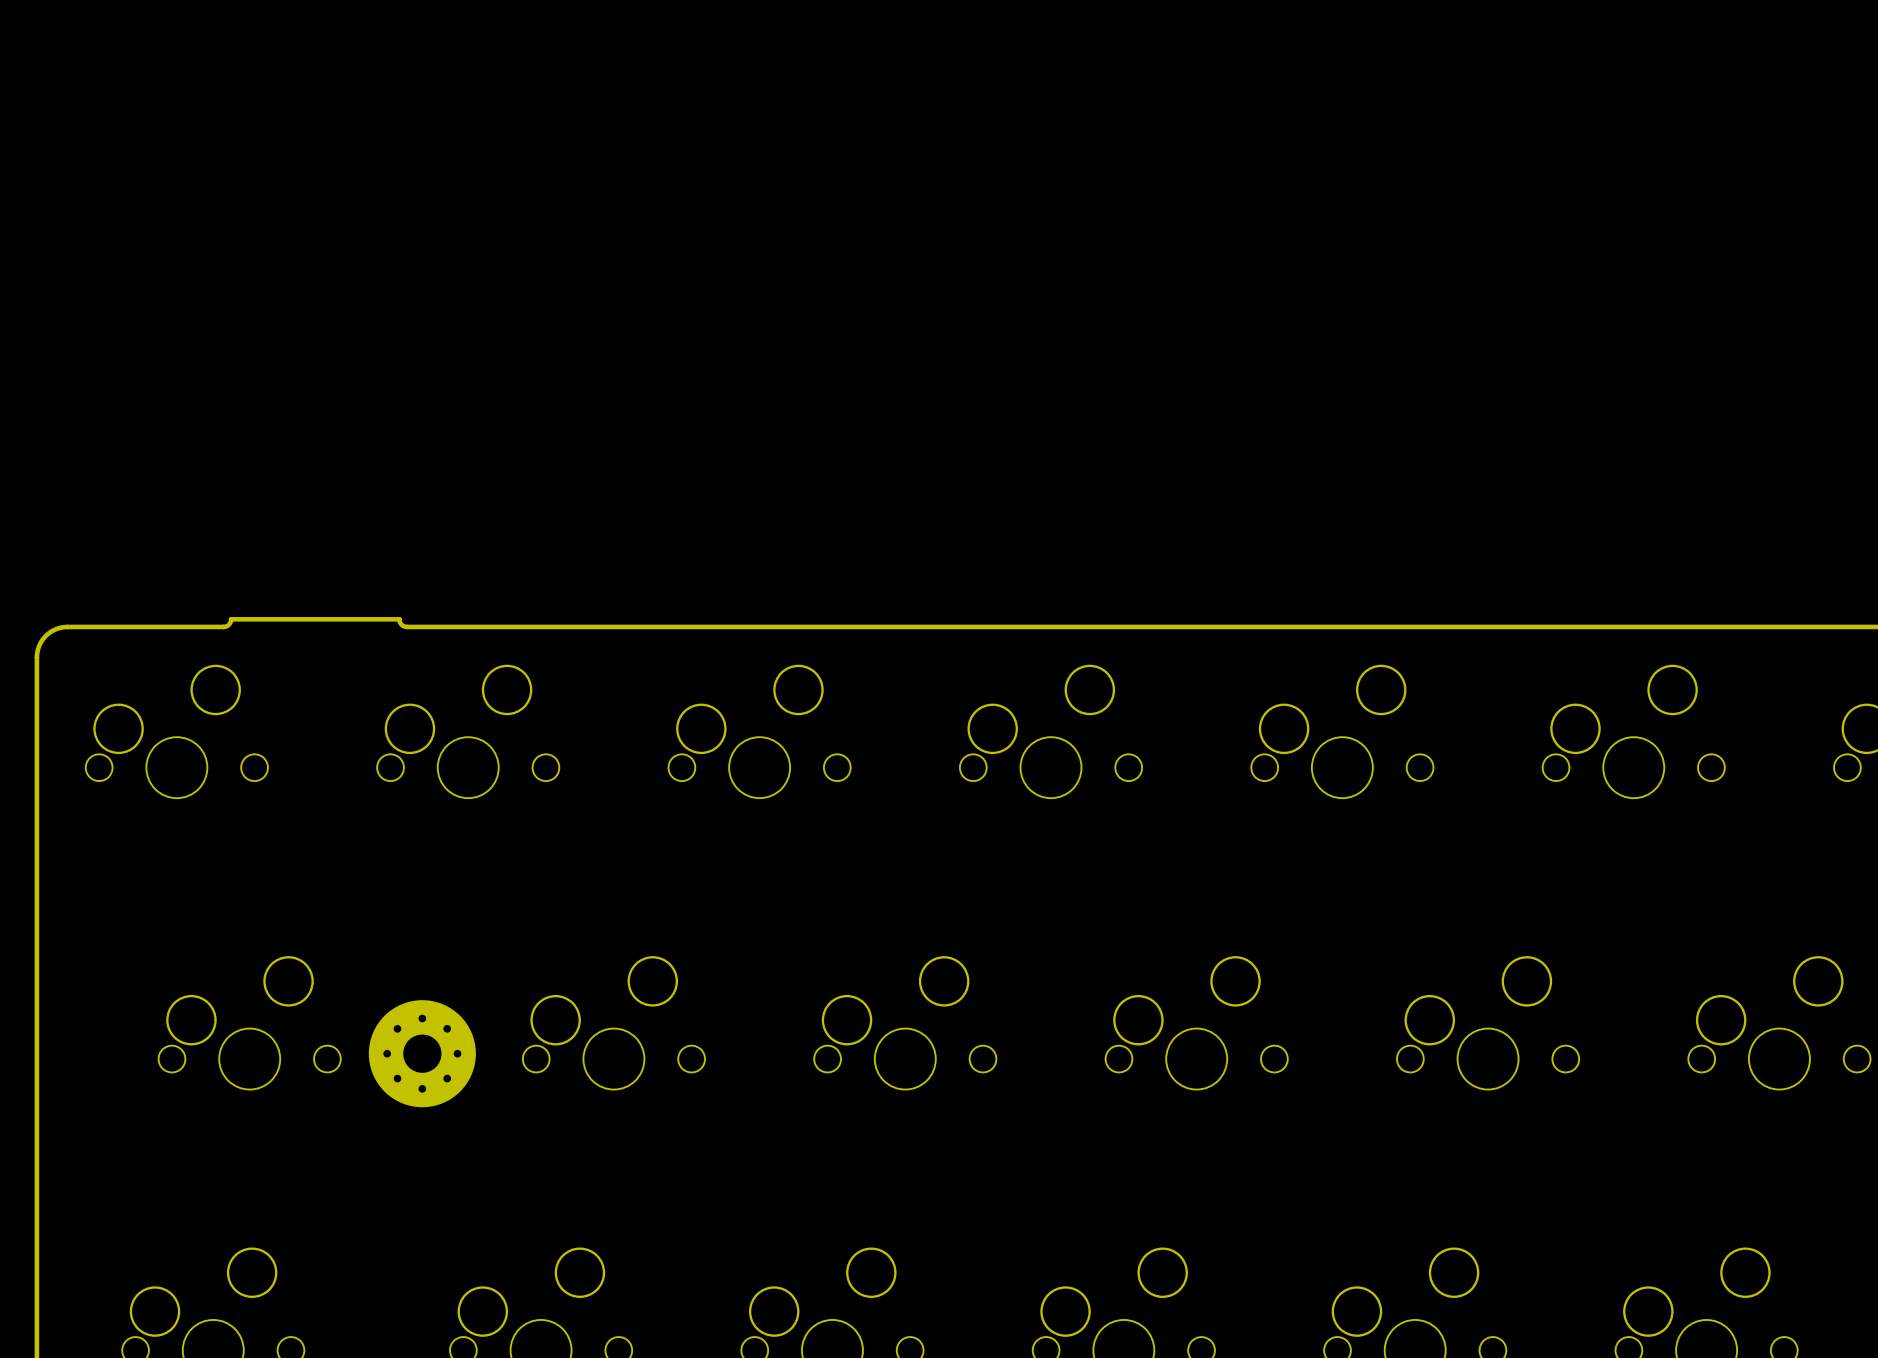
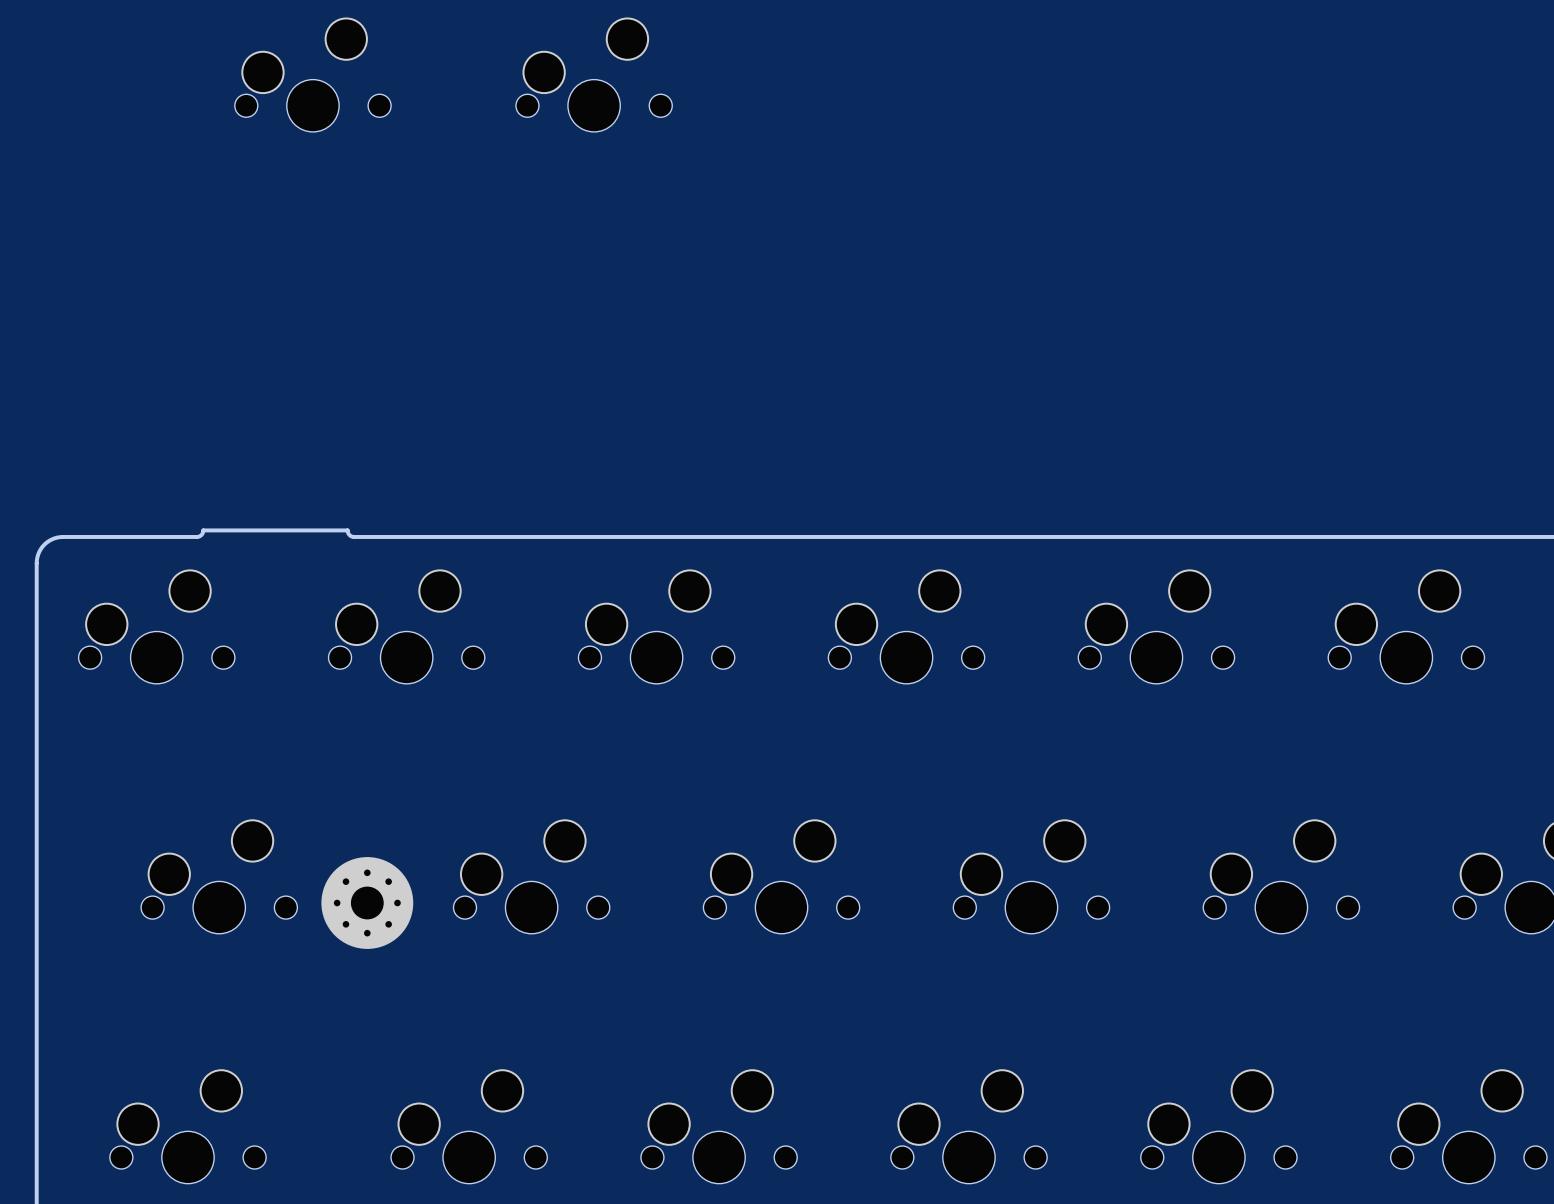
part: none -> (312, 74)
part: none -> (594, 74)

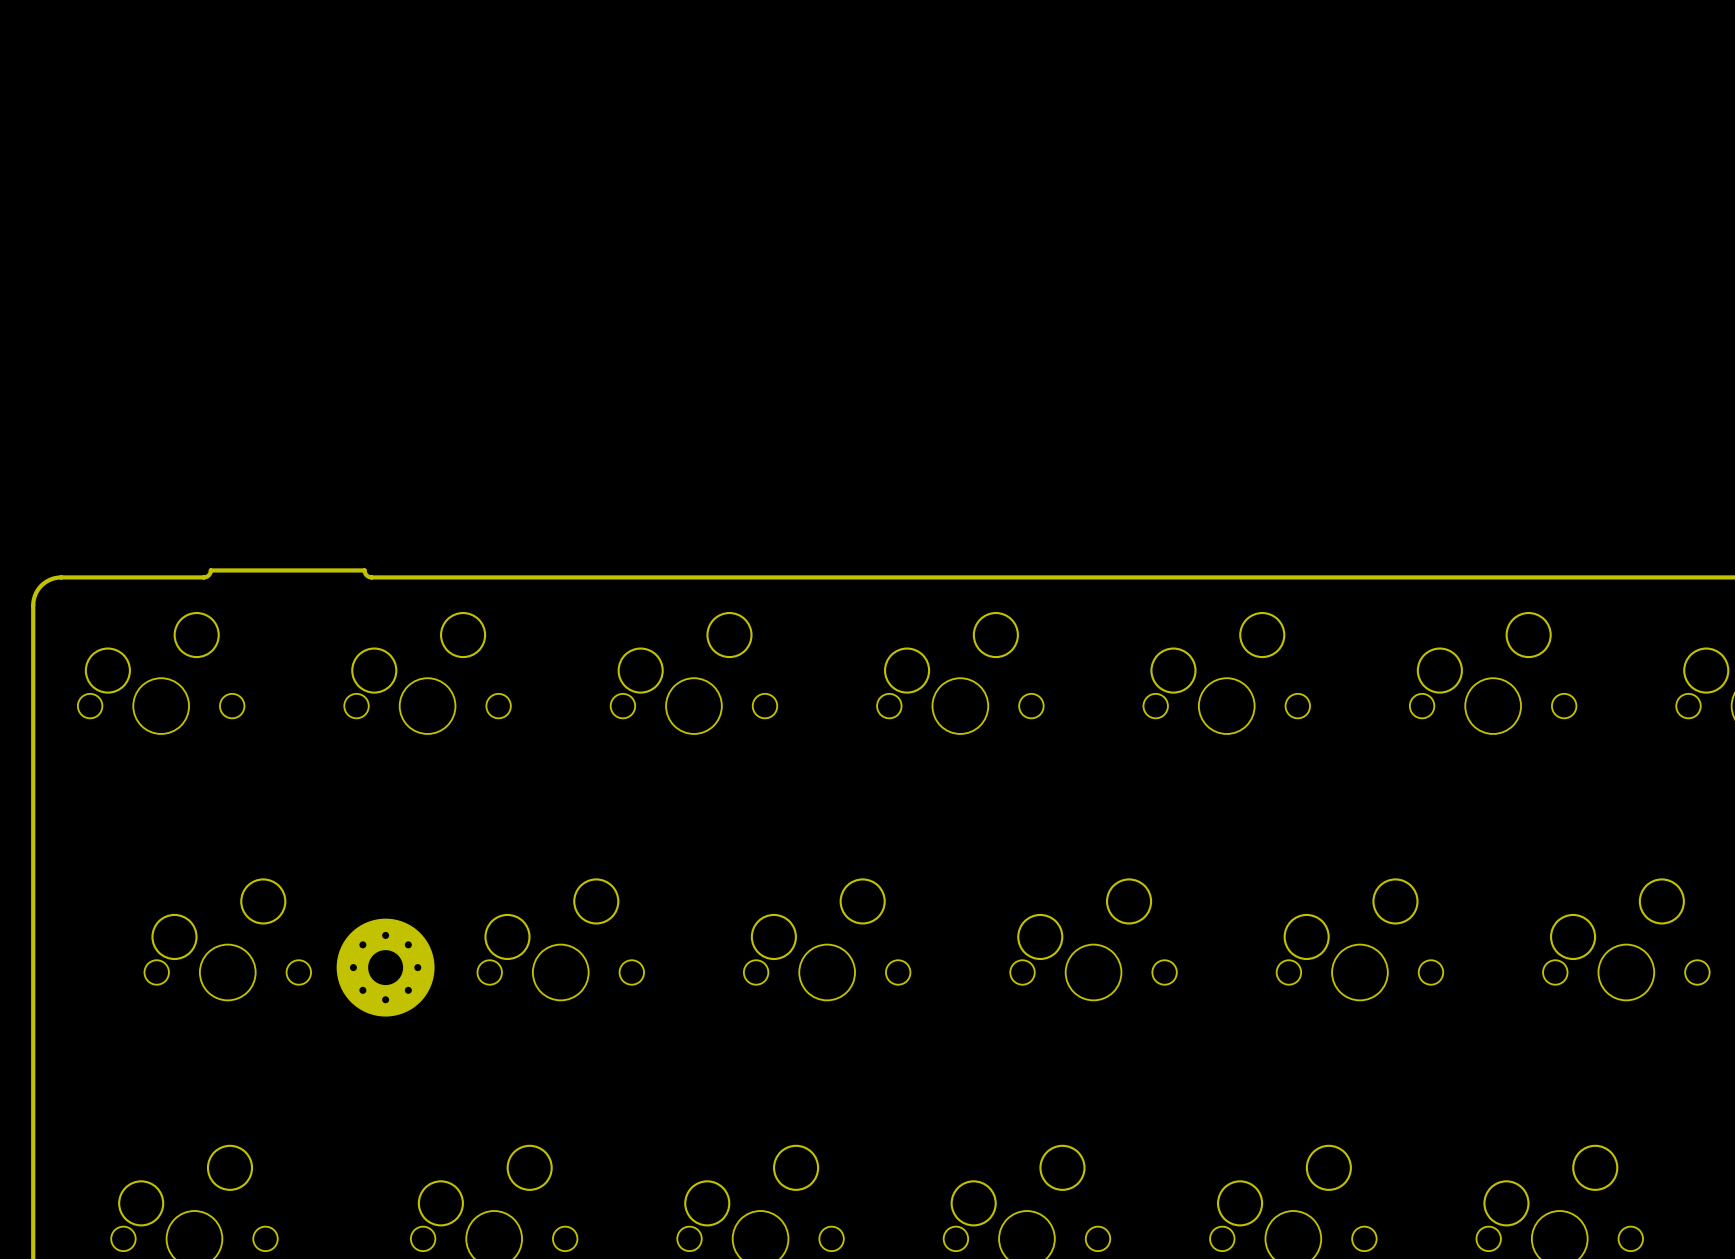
part: (312, 74) -> none
part: (594, 74) -> none

